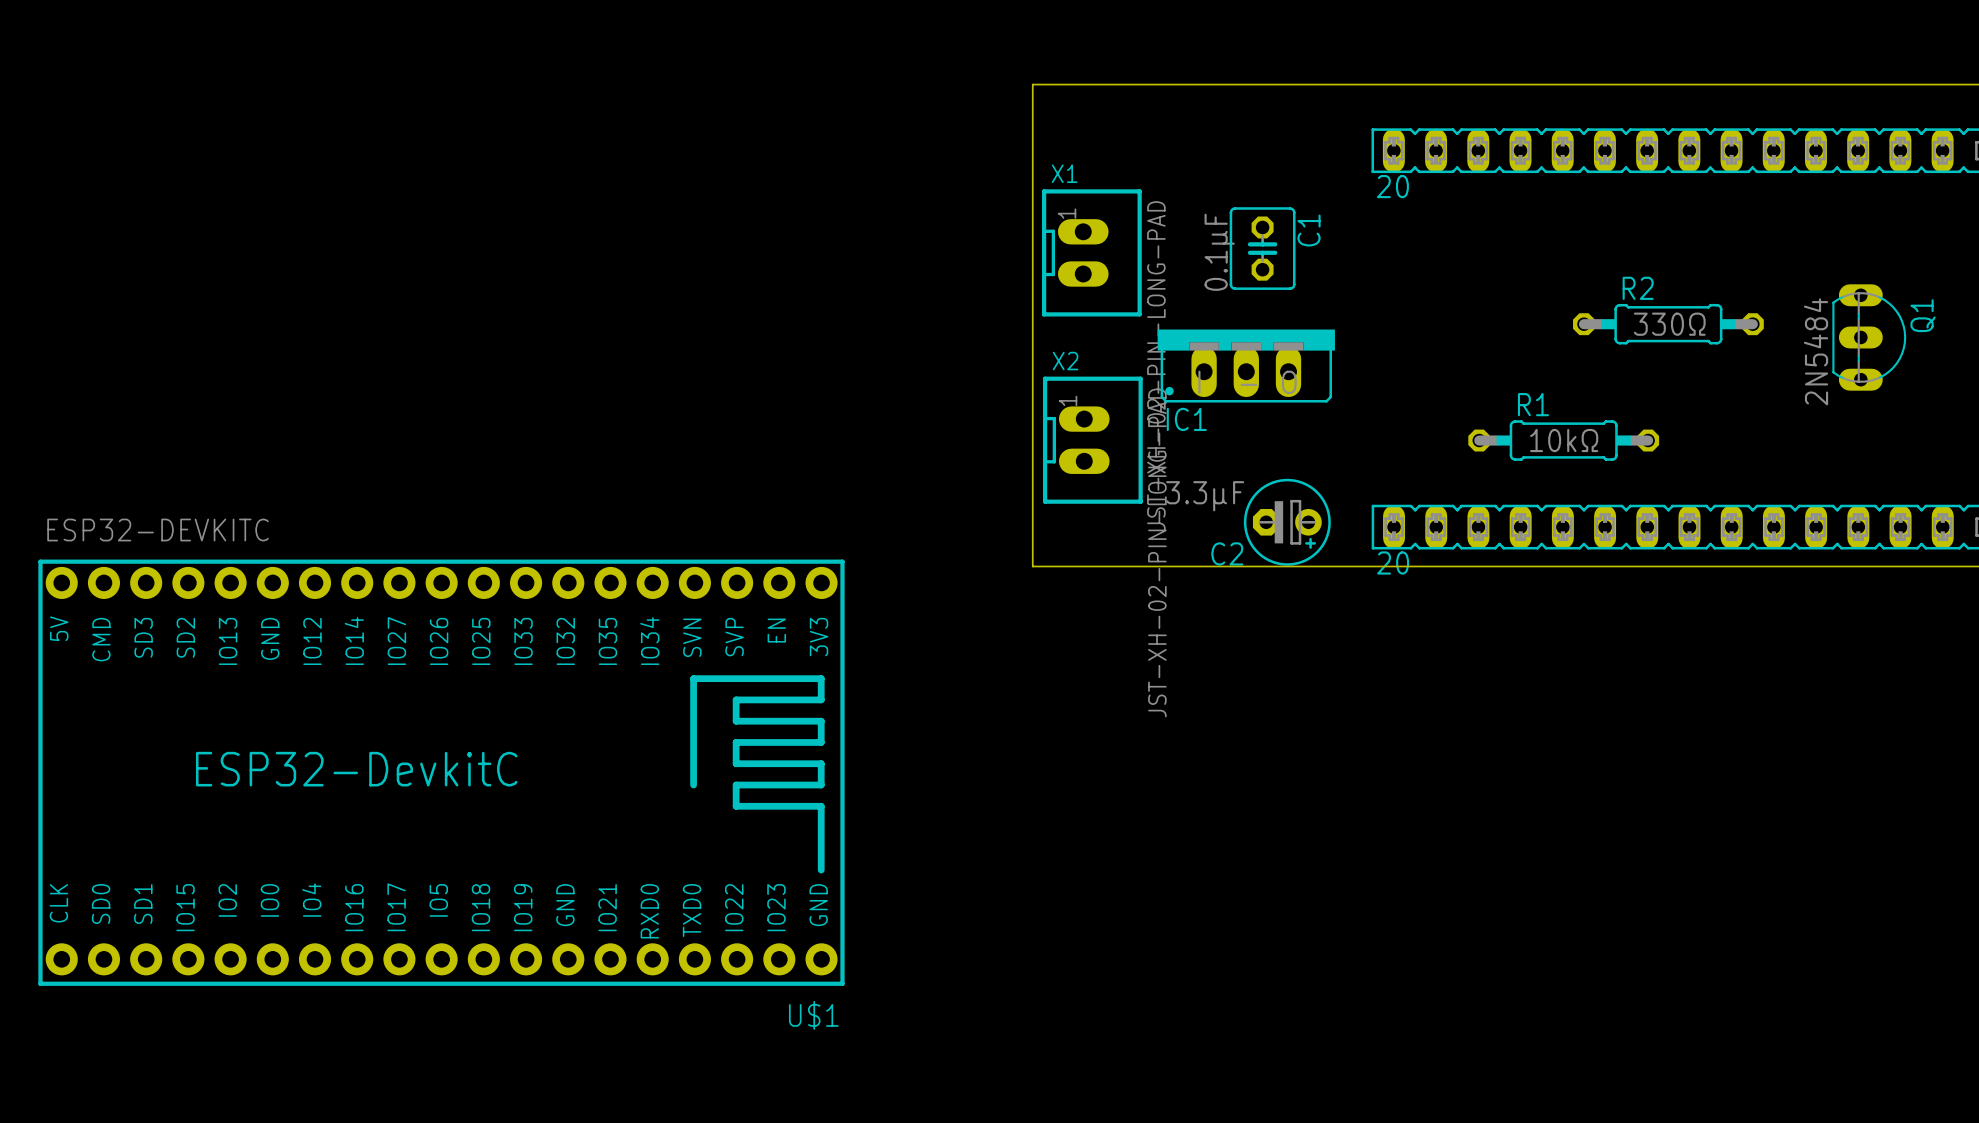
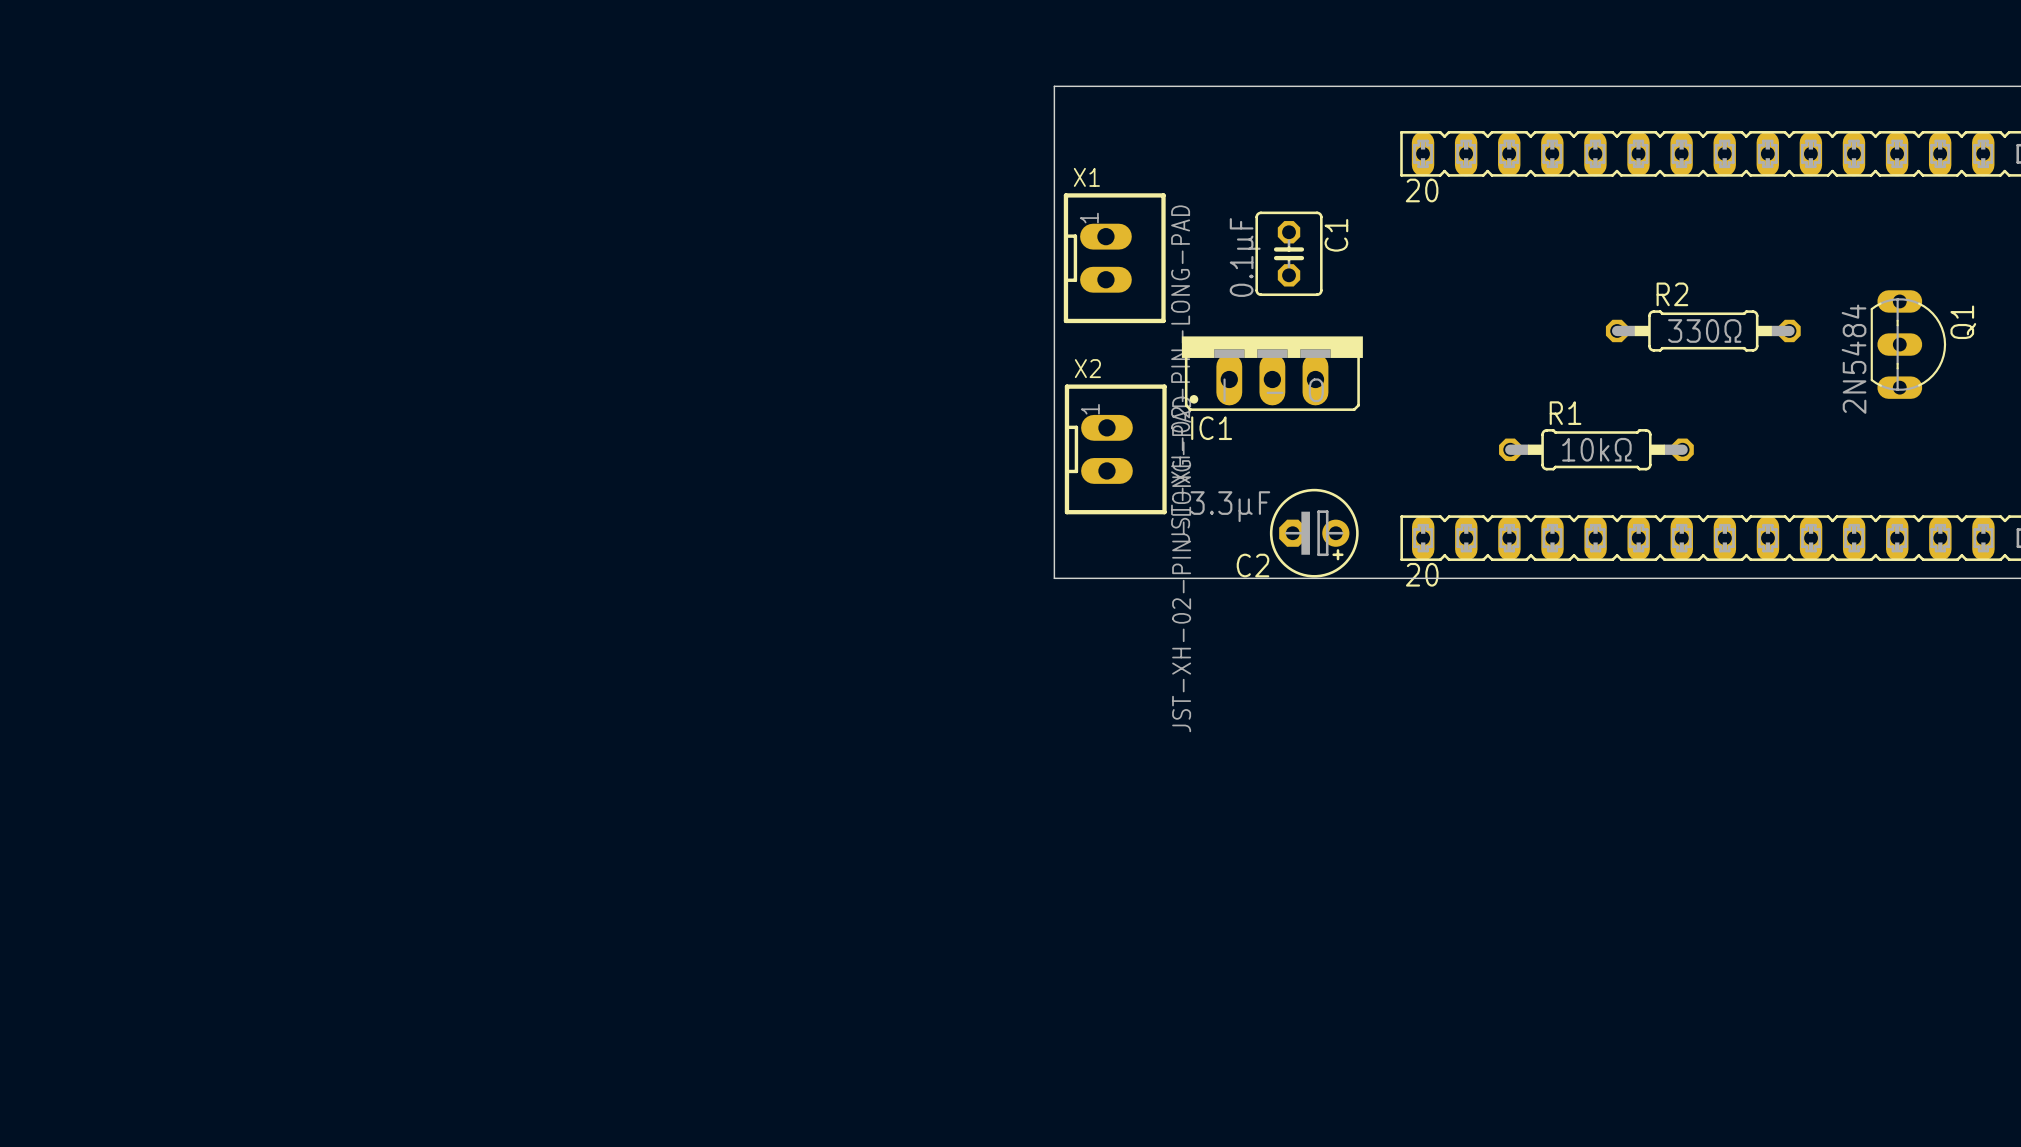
U$1: (441, 772) -> none

